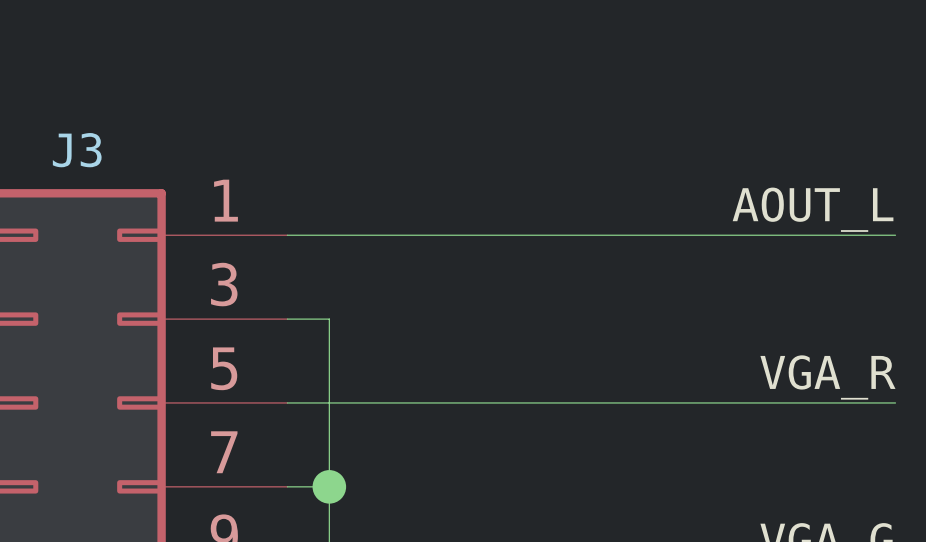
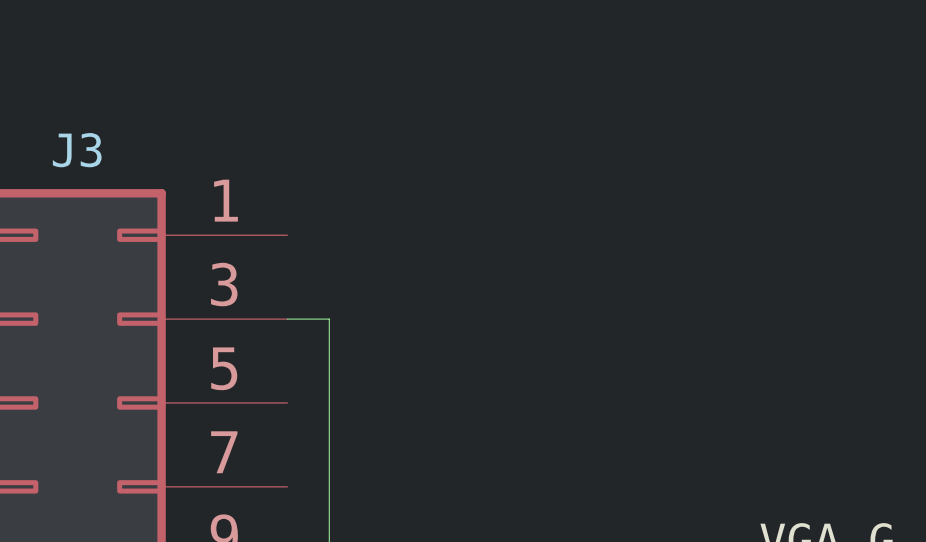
label: AOUT_L (813, 209) -> none
wire: (287, 235) (895, 235) -> none
label: VGA_R (827, 377) -> none
wire: (287, 402) (895, 402) -> none
wire: (287, 486) (329, 486) -> none
junction: (329, 486) -> none

